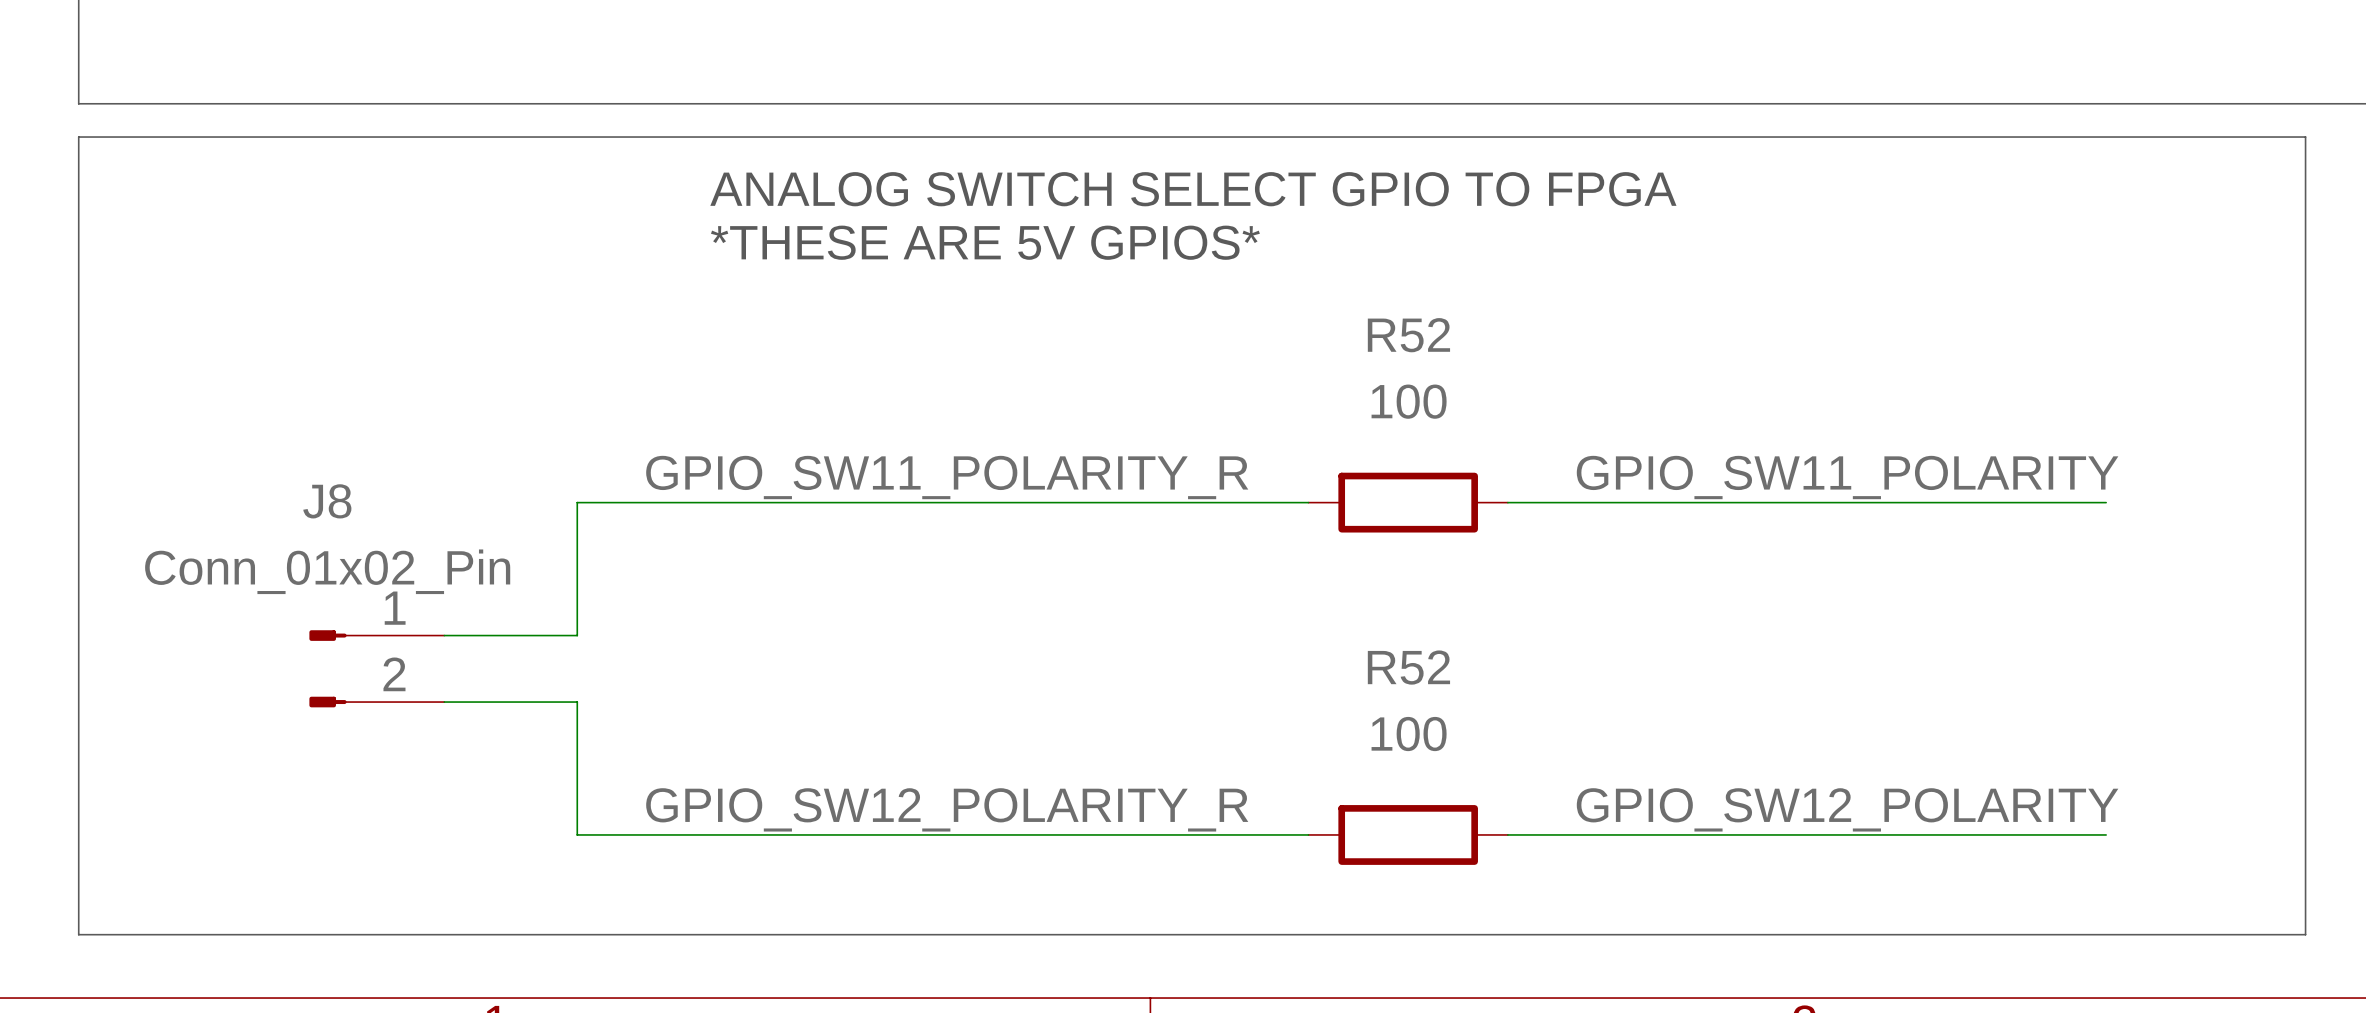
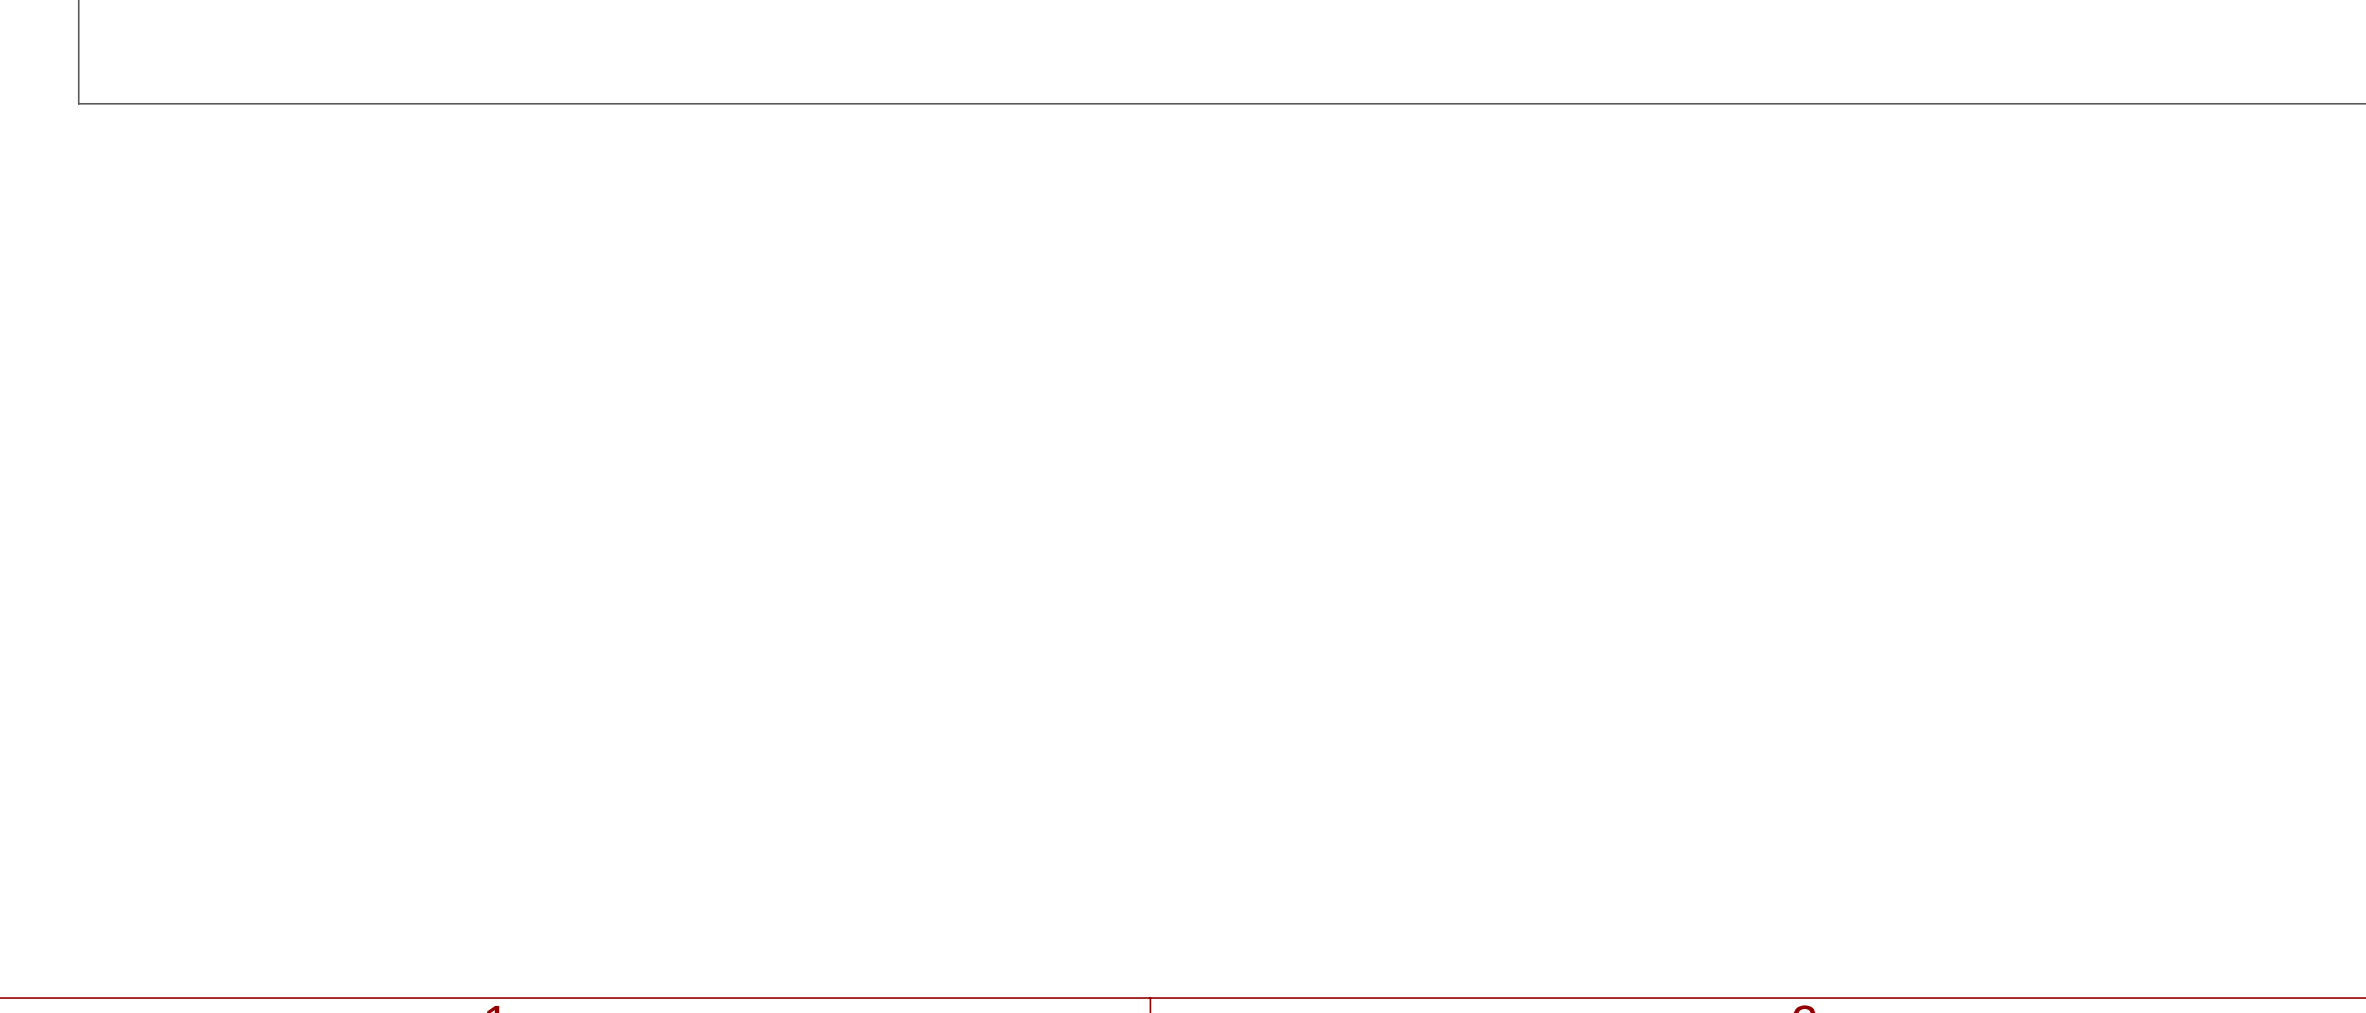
line: (78, 137) (78, 934) (2305, 934) (2305, 137) (78, 137) -> none
text: ANALOG SWITCH SELECT GPIO TO FPGA (1193, 189) -> none
text: *THESE ARE 5V GPIOS* (985, 242) -> none
label: GPIO_SW11_POLARITY_R (947, 477) -> none
label: GPIO_SW11_POLARITY (1847, 477) -> none
wire: (1308, 502) (577, 502) (577, 635) (444, 635) -> none
R52: 100 (1408, 502) -> none
wire: (1507, 502) (2106, 502) -> none
J8: Conn_01x02_Pin (376, 668) -> none
wire: (444, 702) (577, 702) (577, 834) (1308, 834) -> none
label: GPIO_SW12_POLARITY_R (947, 809) -> none
label: GPIO_SW12_POLARITY (1847, 809) -> none
R52: 100 (1408, 834) -> none
wire: (1507, 834) (2106, 834) -> none

